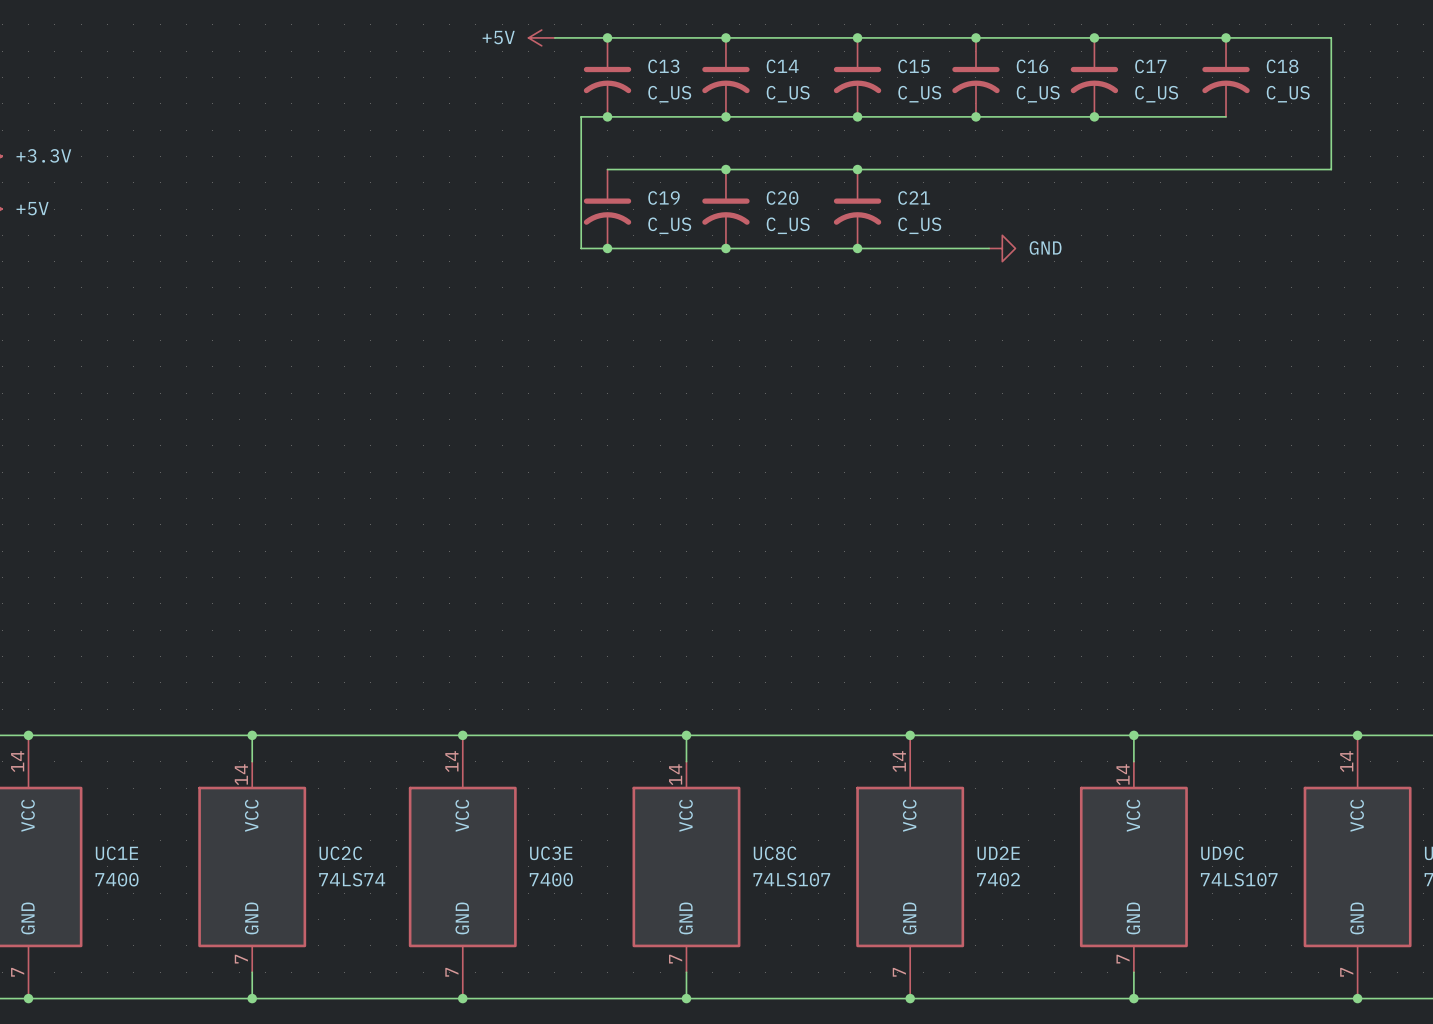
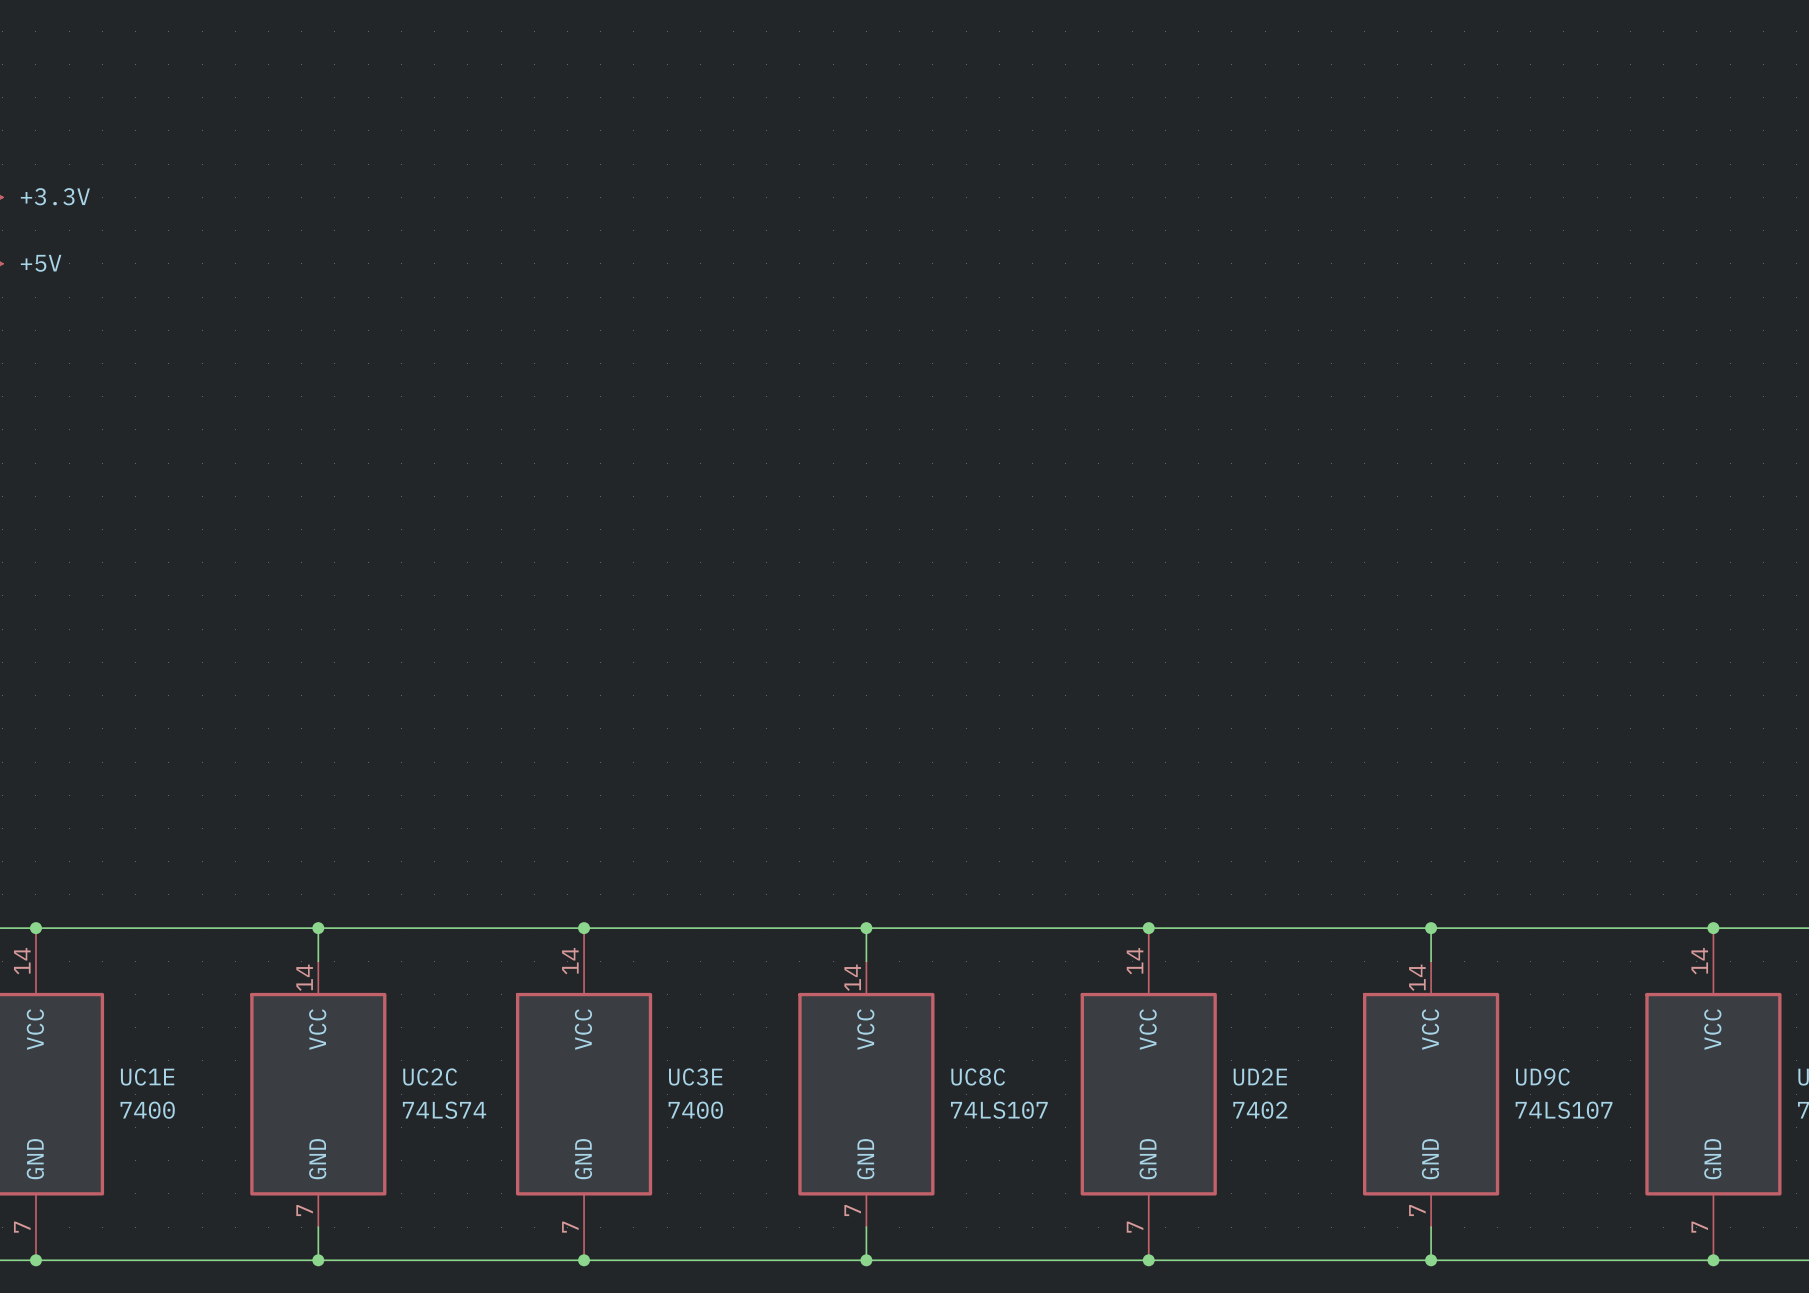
power symbol: +5V (541, 37) -> none
wire: (554, 37) (1331, 37) (1331, 169) (607, 169) -> none
junction: (607, 37) -> none
junction: (725, 37) -> none
junction: (857, 37) -> none
junction: (975, 37) -> none
junction: (1094, 37) -> none
junction: (1226, 37) -> none
C13: C_US (607, 77) -> none
C14: C_US (725, 77) -> none
C15: C_US (857, 77) -> none
C16: C_US (975, 77) -> none
C17: C_US (1094, 77) -> none
C18: C_US (1226, 77) -> none
junction: (607, 116) -> none
junction: (725, 116) -> none
junction: (857, 116) -> none
junction: (975, 116) -> none
junction: (1094, 116) -> none
wire: (1226, 116) (581, 116) (581, 248) (989, 248) -> none
junction: (725, 169) -> none
junction: (857, 169) -> none
C19: C_US (607, 209) -> none
C20: C_US (725, 209) -> none
C21: C_US (857, 209) -> none
junction: (607, 248) -> none
junction: (725, 248) -> none
junction: (857, 248) -> none
power symbol: GND (1002, 248) -> none

